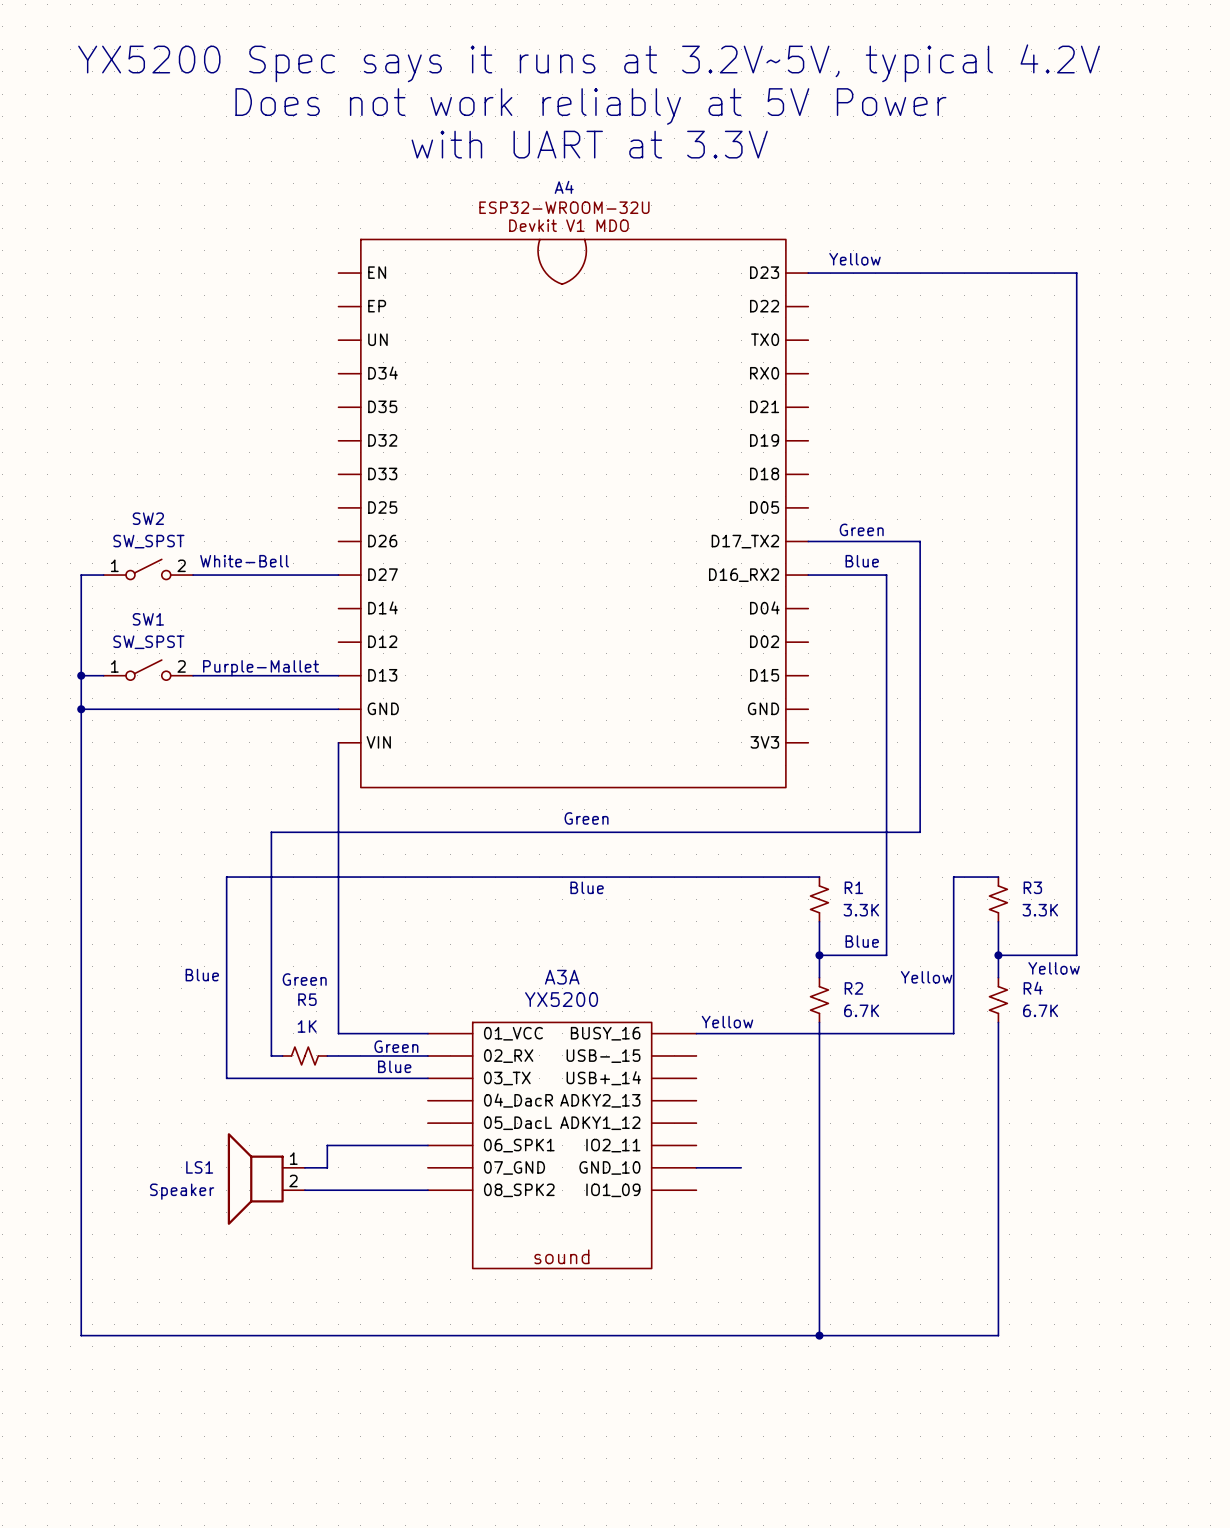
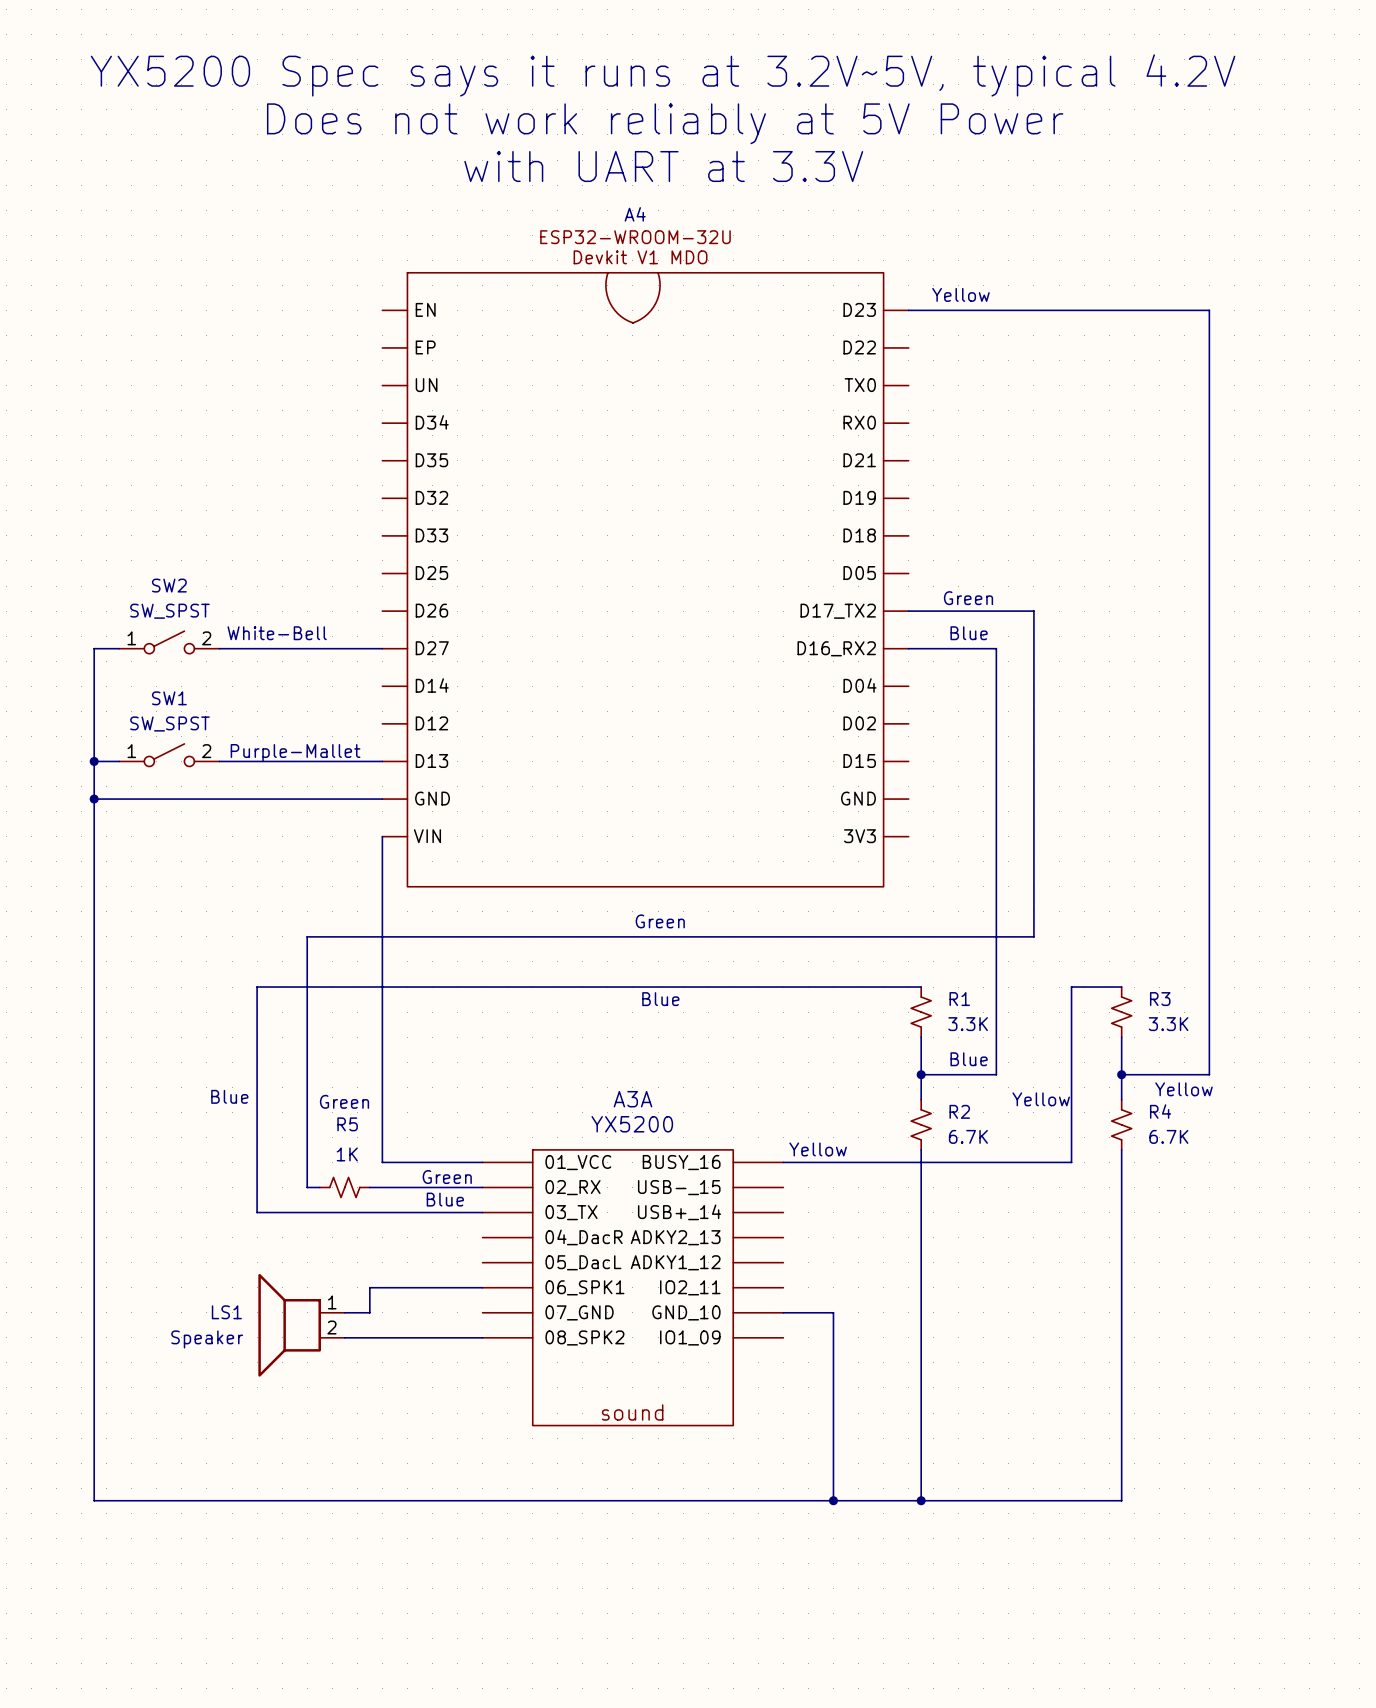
wire: none -> (833, 1312) (833, 1500)
junction: none -> (833, 1500)

